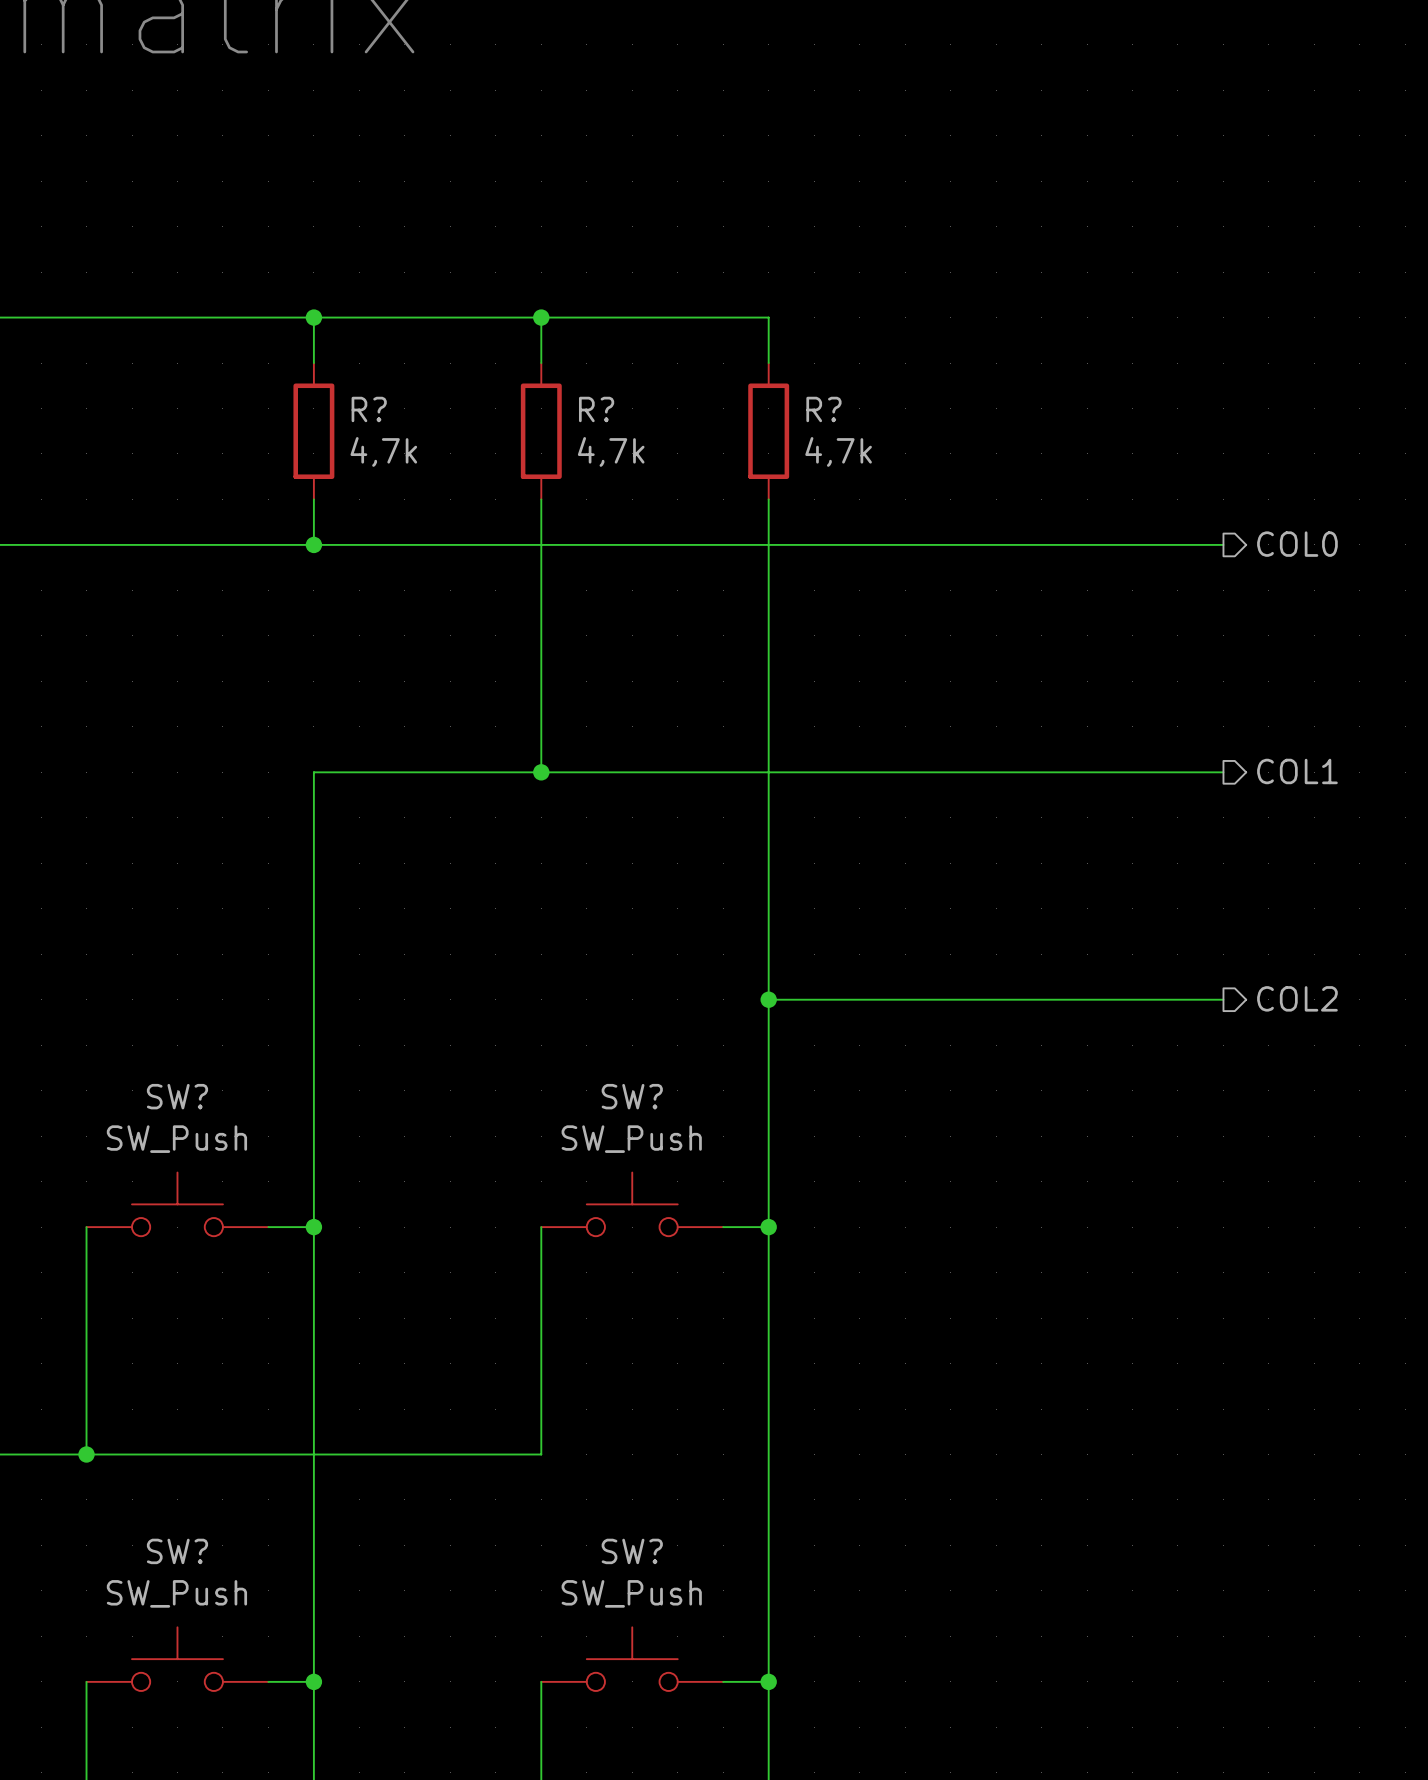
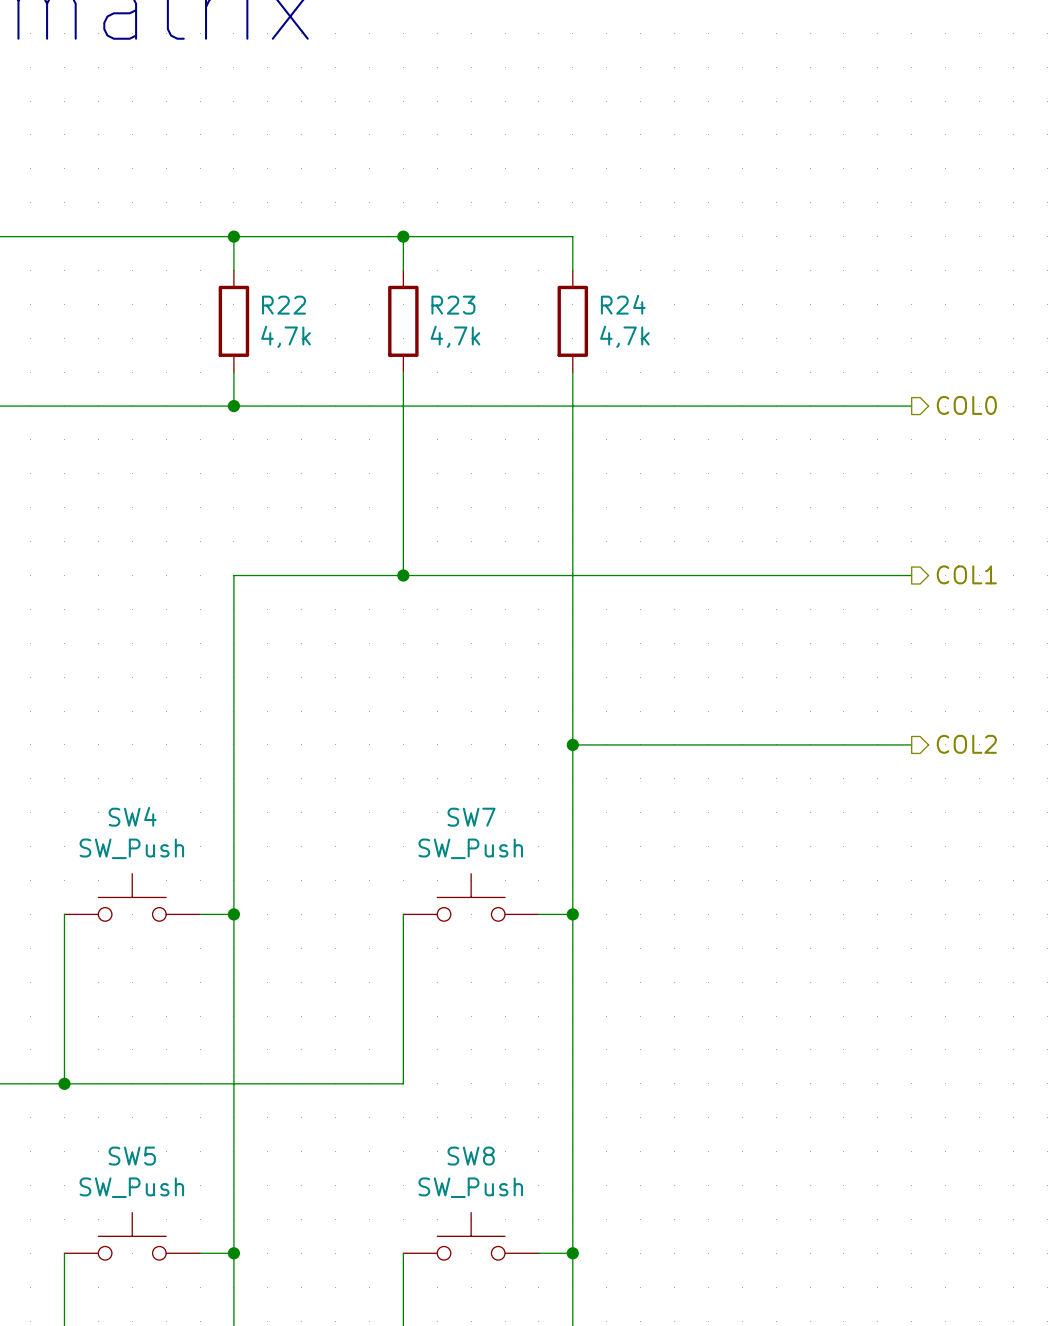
R? name: R? (369, 409) -> R22 (283, 305)
R? name: R? (596, 409) -> R23 (453, 305)
R? name: R? (823, 409) -> R24 (623, 304)
SW? name: SW? (177, 1096) -> SW4 (132, 816)
SW? name: SW? (632, 1096) -> SW7 (471, 817)
SW? name: SW? (177, 1551) -> SW5 (132, 1156)
SW? name: SW? (632, 1551) -> SW8 (471, 1156)

